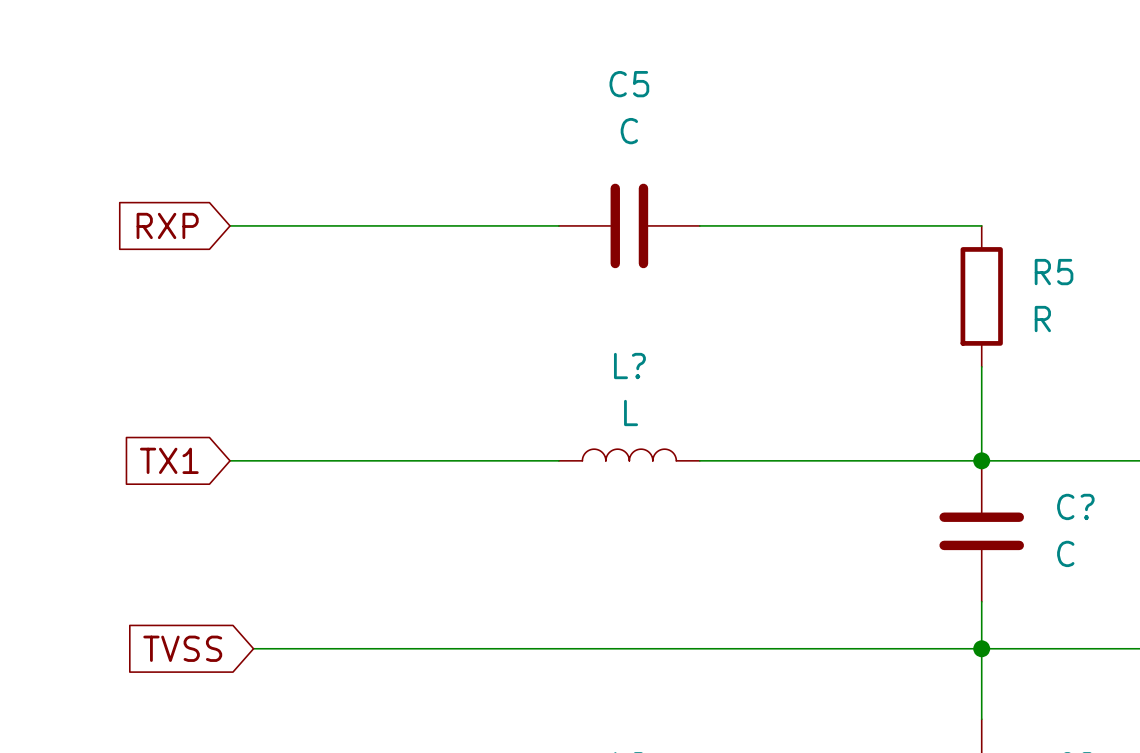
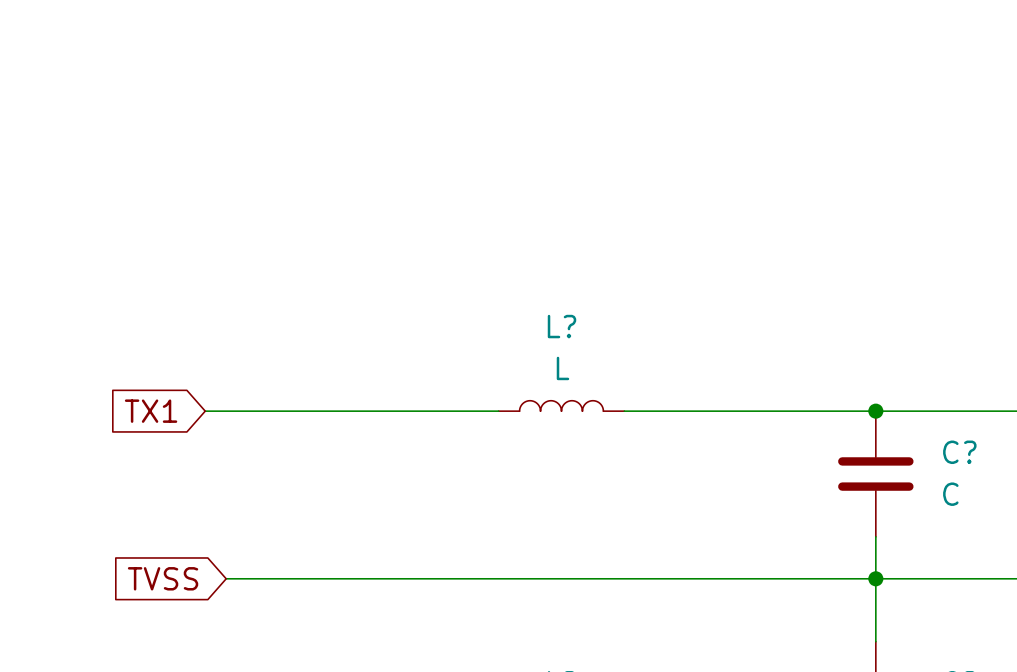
global label: RXP (167, 225) -> none
wire: (230, 225) (558, 225) -> none
C5: C (629, 225) -> none
wire: (699, 225) (981, 225) -> none
R5: R (981, 296) -> none
wire: (981, 366) (981, 460) -> none

